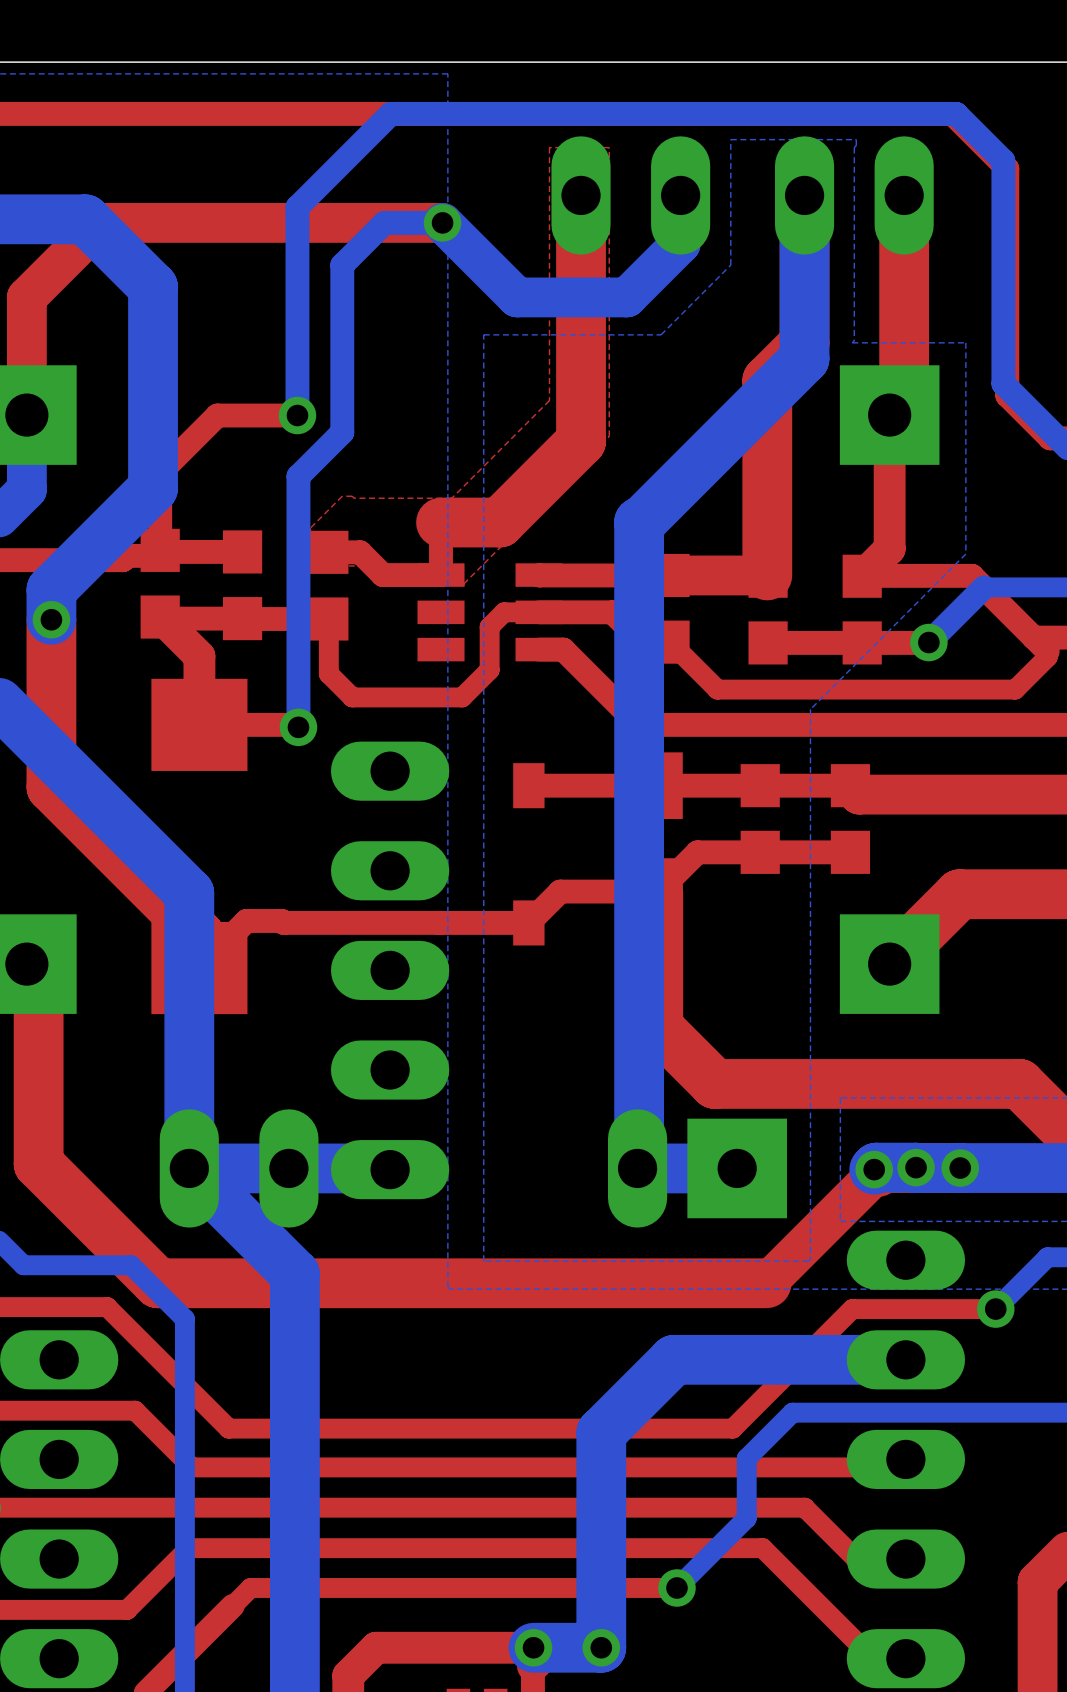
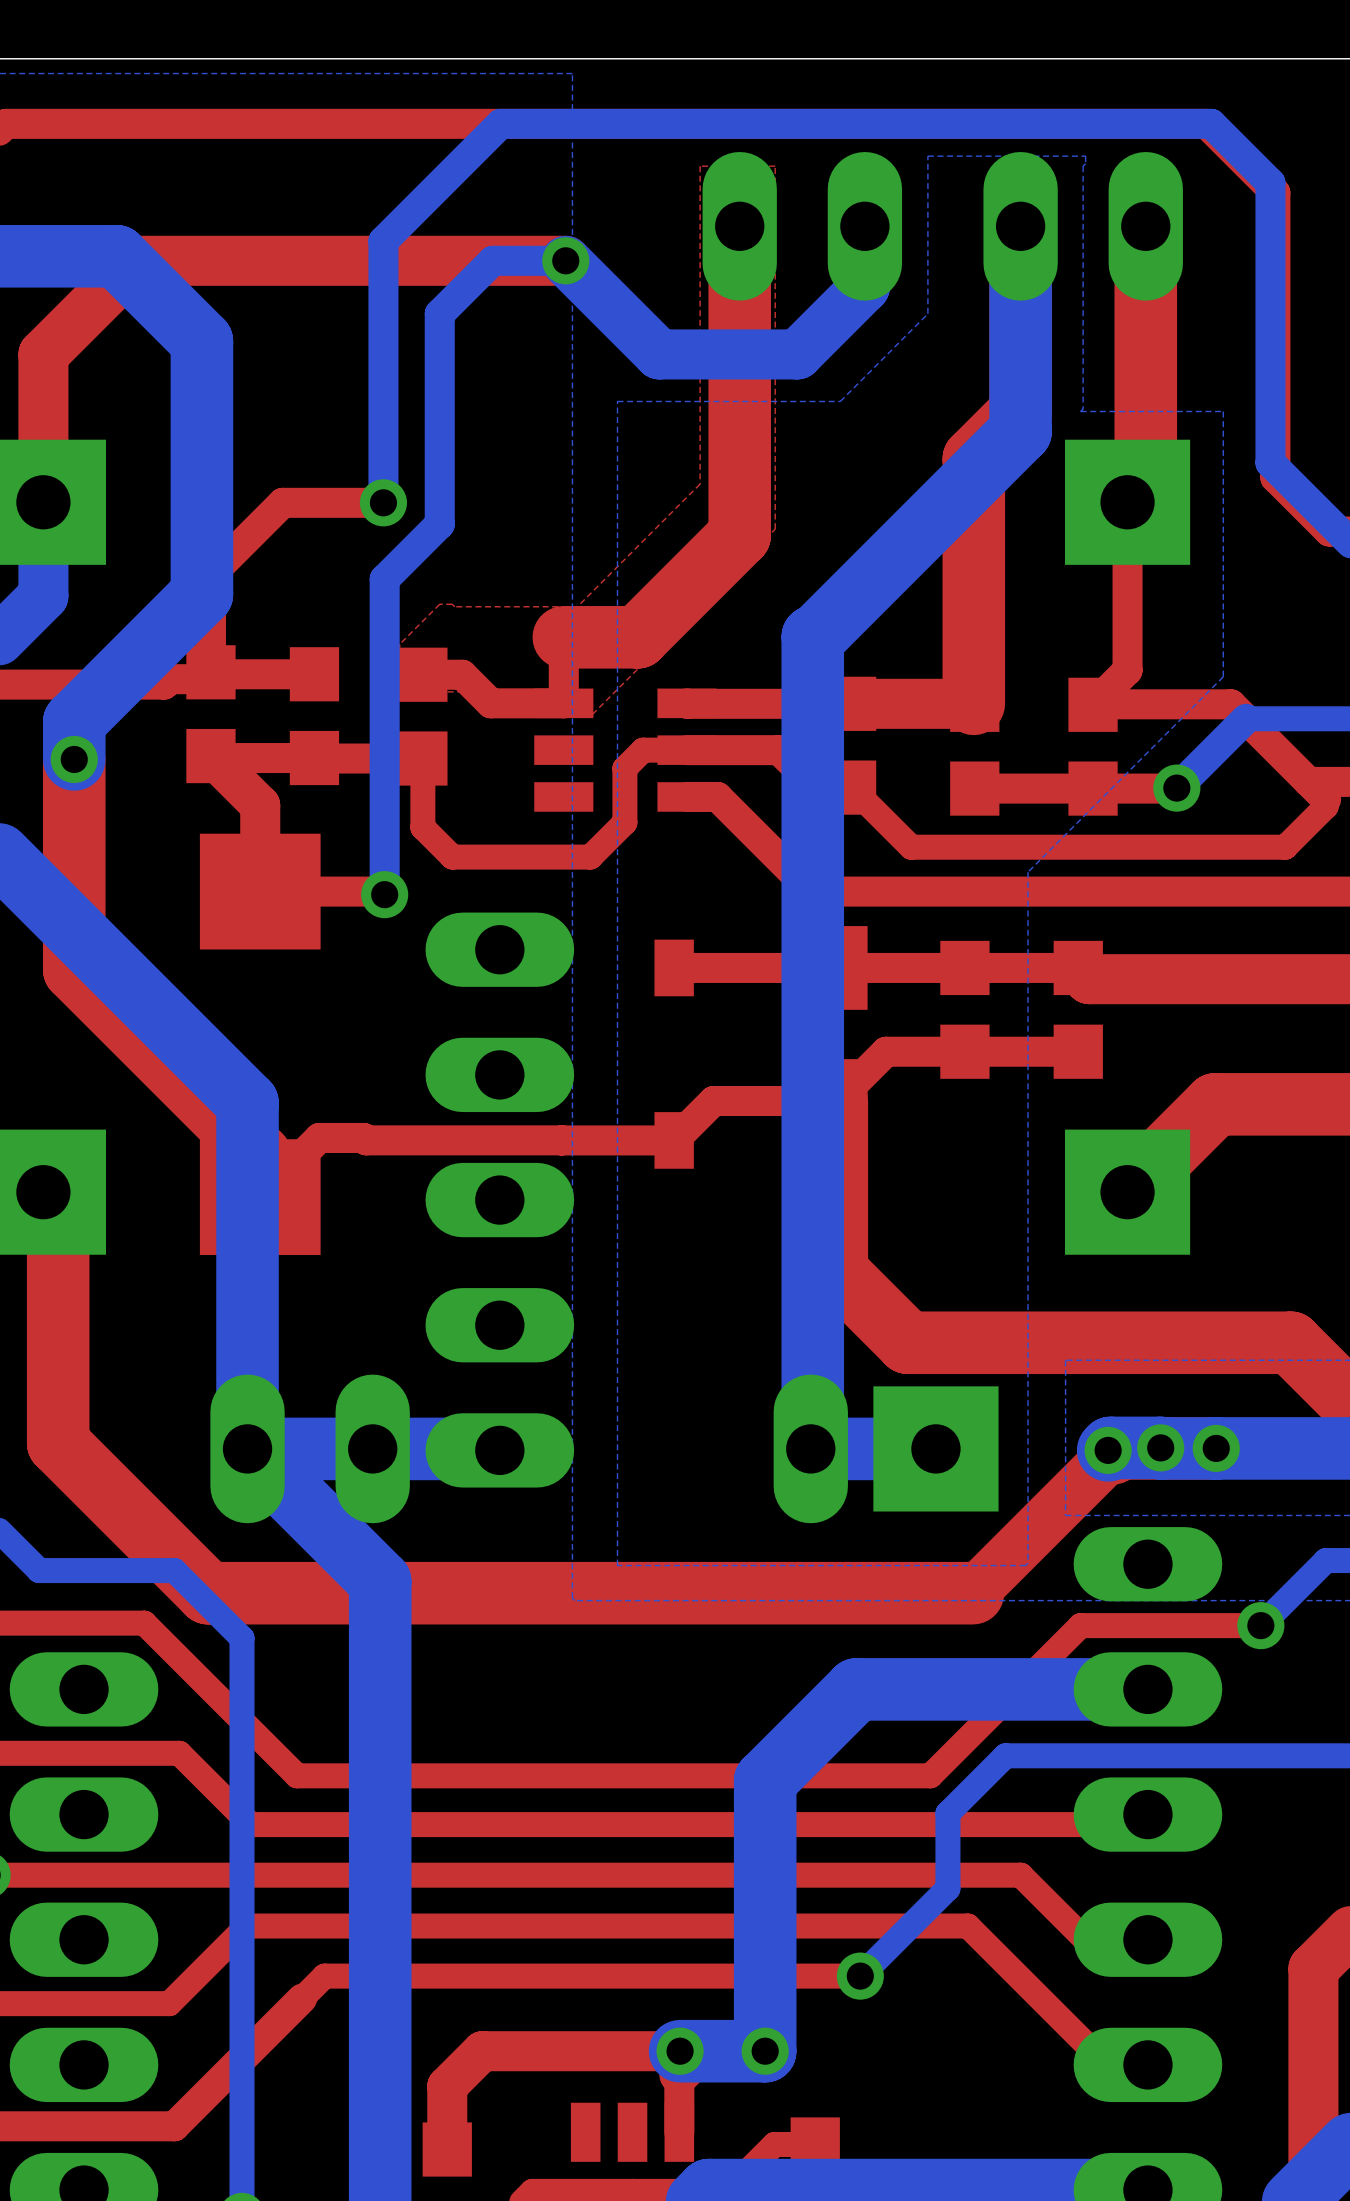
top track width: thick (889, 415) (889, 548) (862, 576) -> thin (1127, 502) (1127, 670) (1093, 704)

